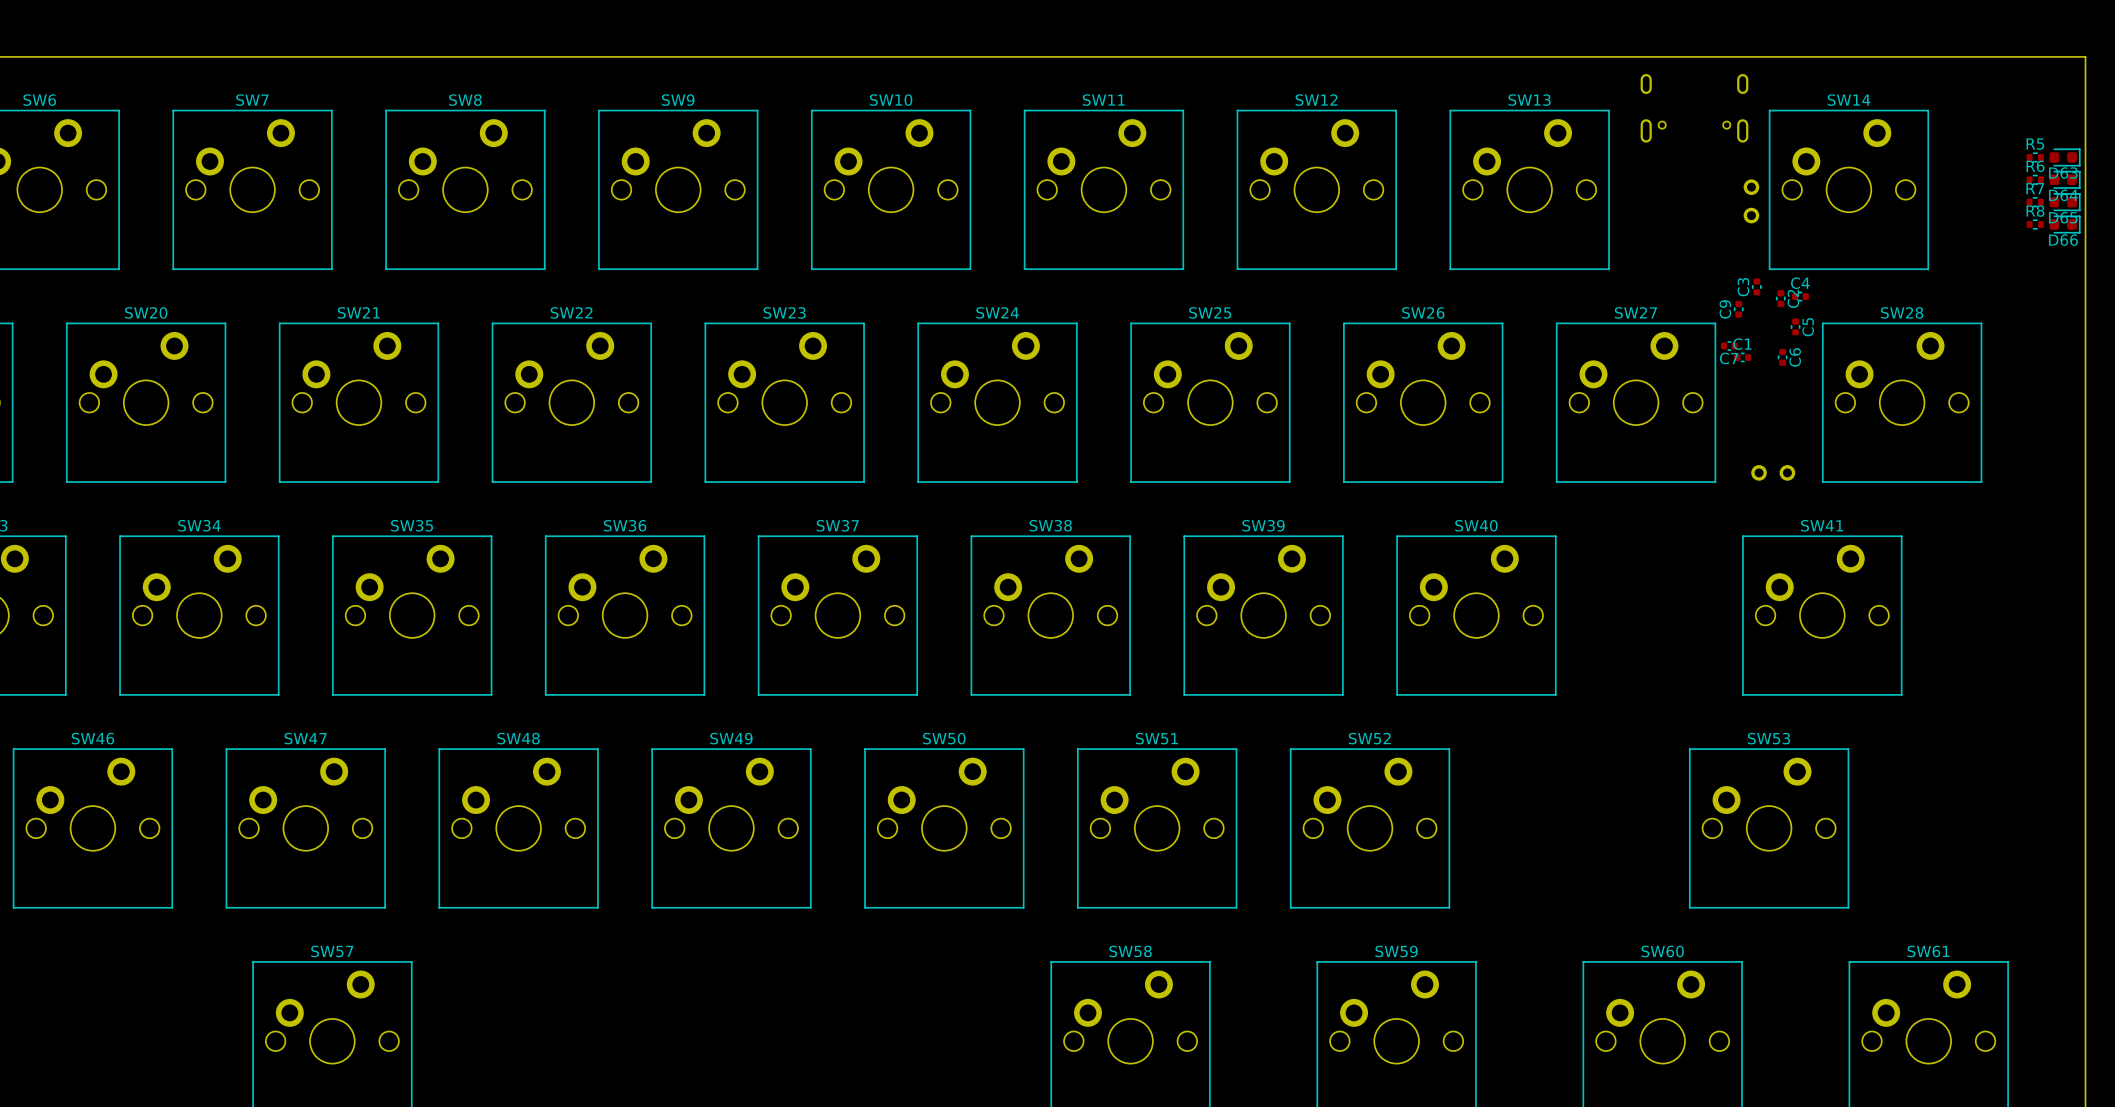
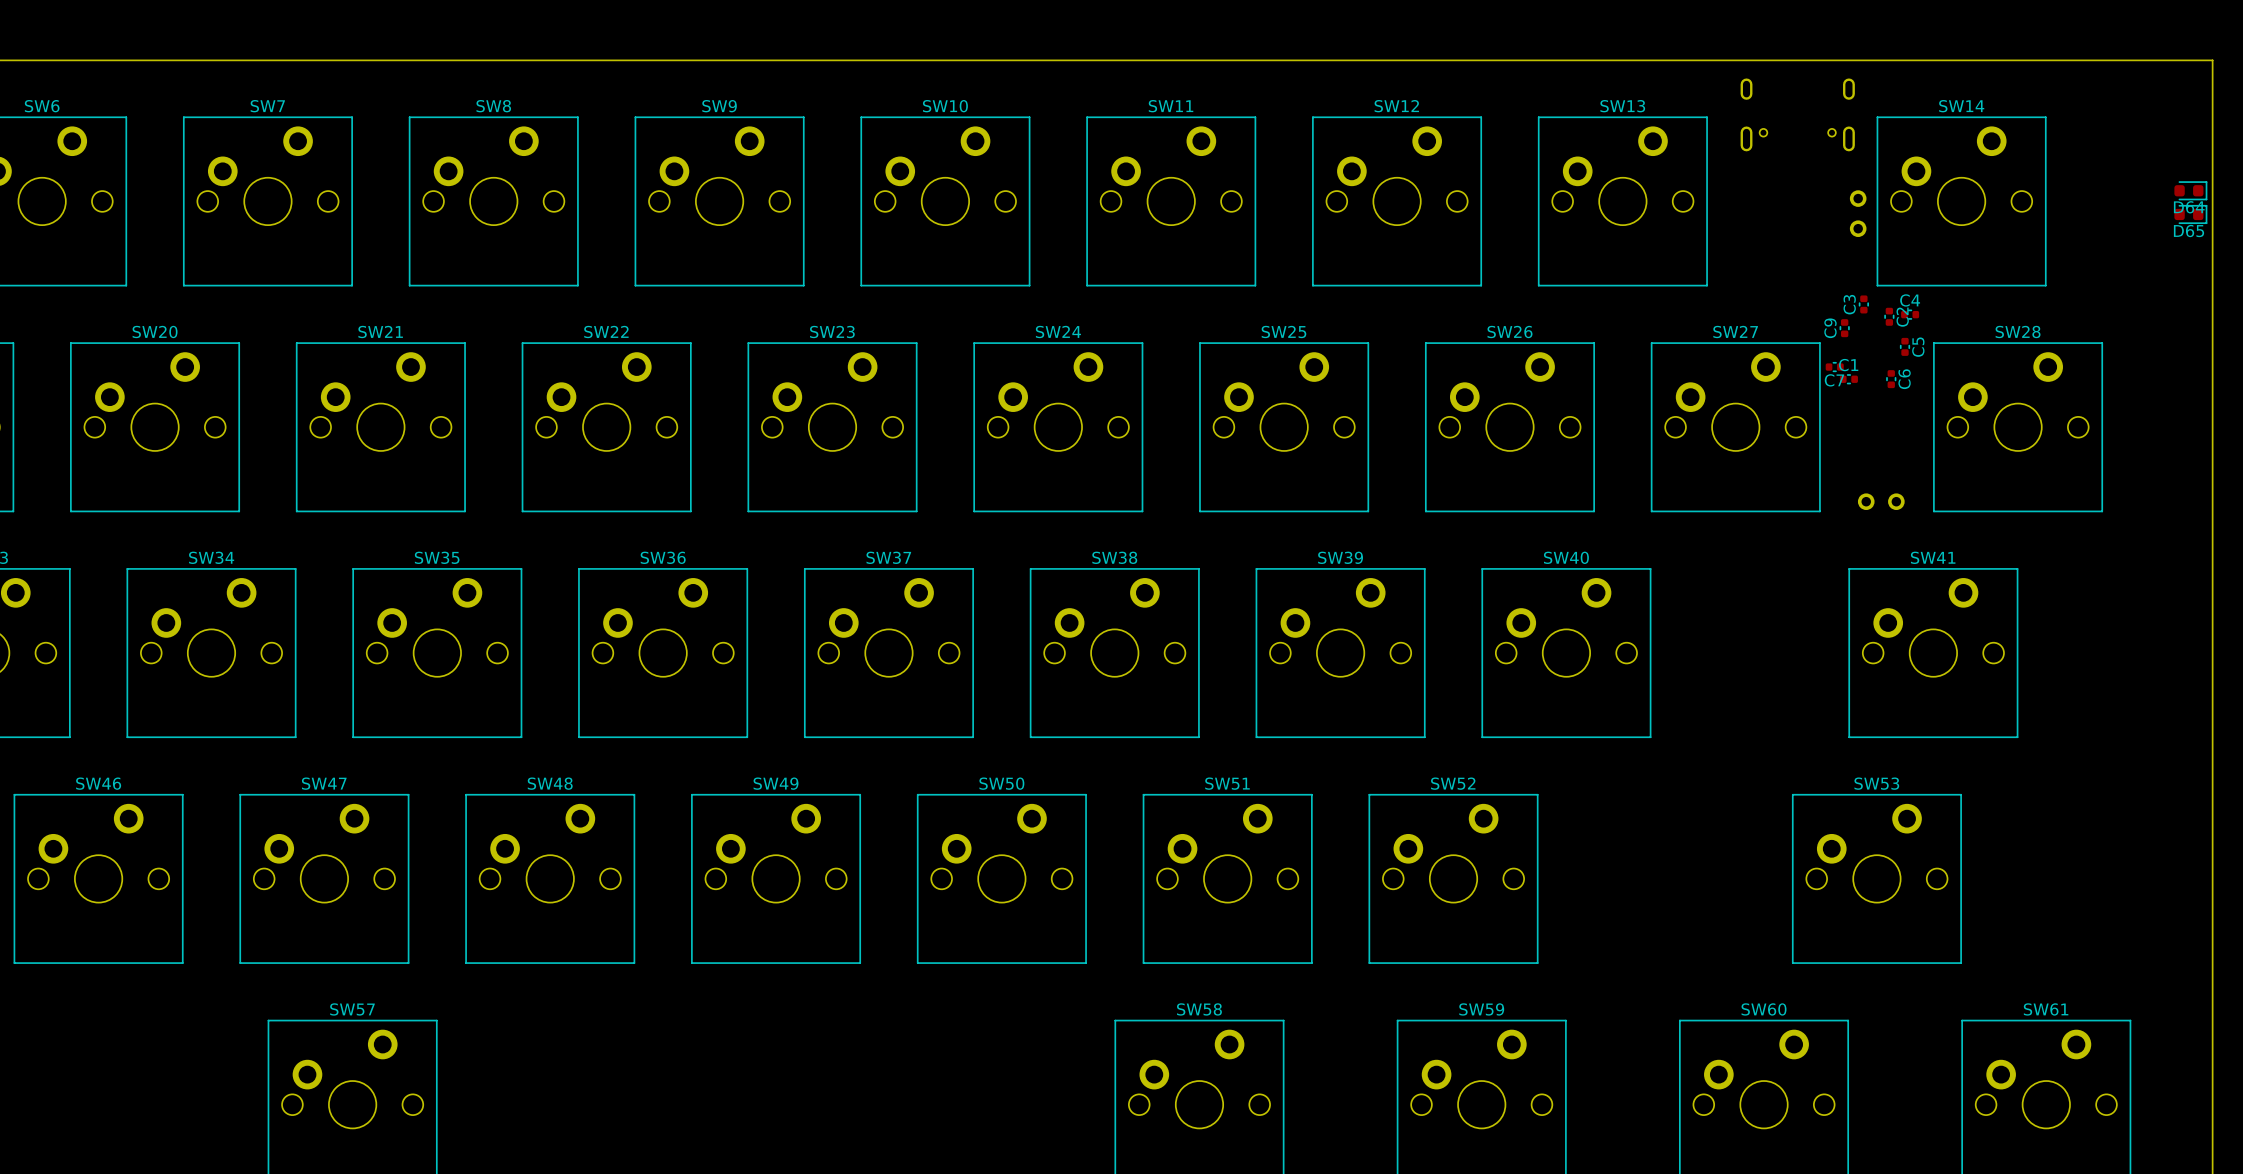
R5: (2035, 157) -> none
D63: (2064, 157) -> none
R6: (2035, 179) -> none
R7: (2035, 202) -> none
R8: (2035, 224) -> none
D66: (2064, 224) -> none

